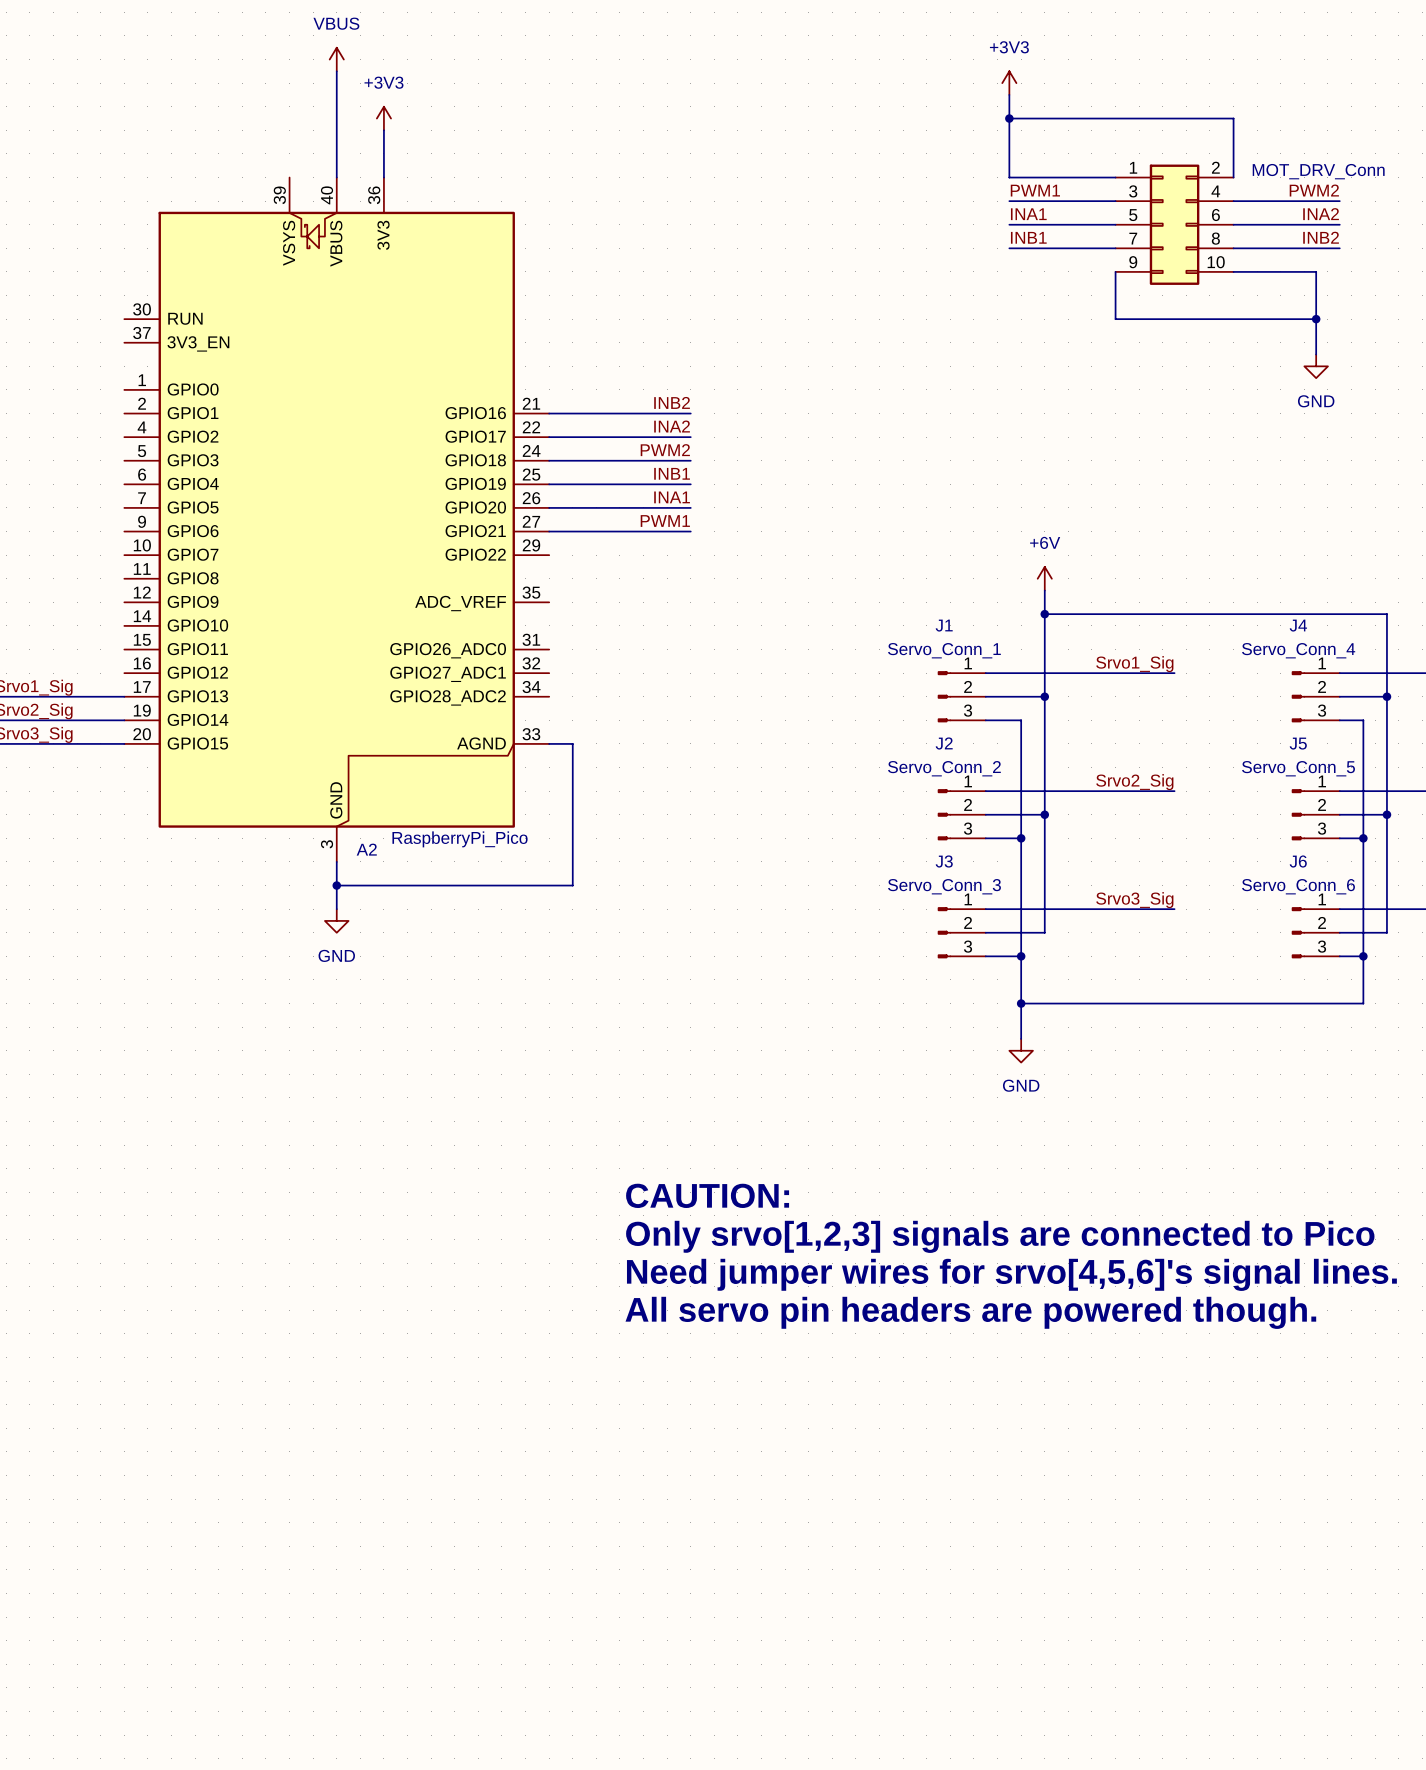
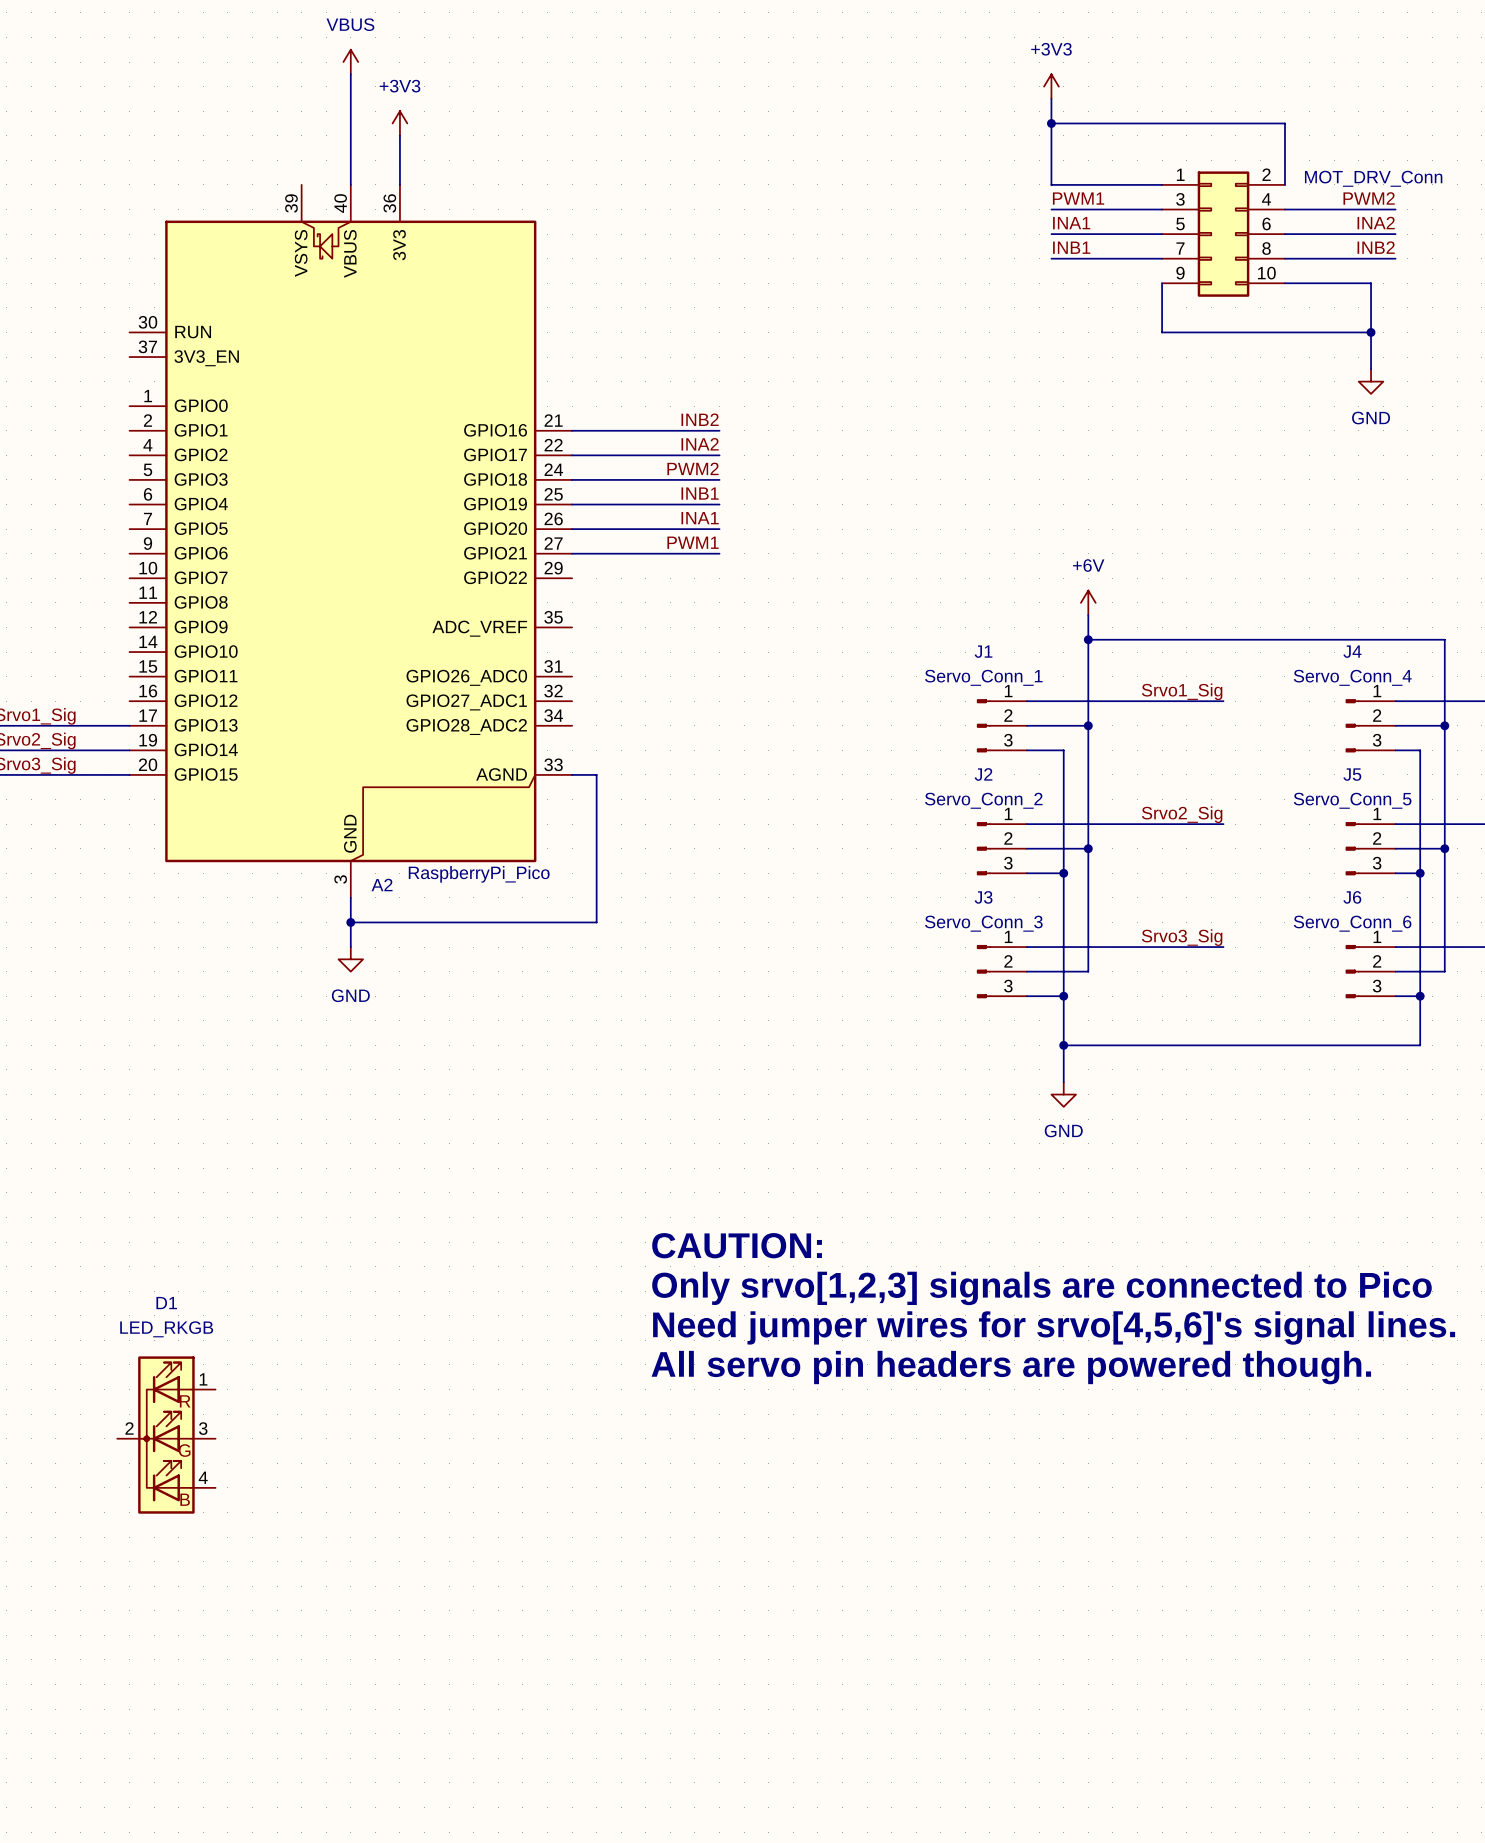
D1: none -> LED_RKGB (166, 1435)

